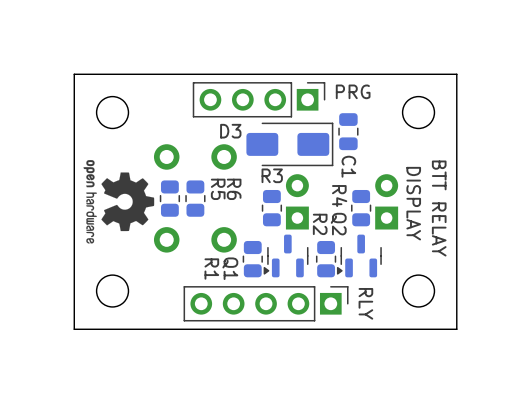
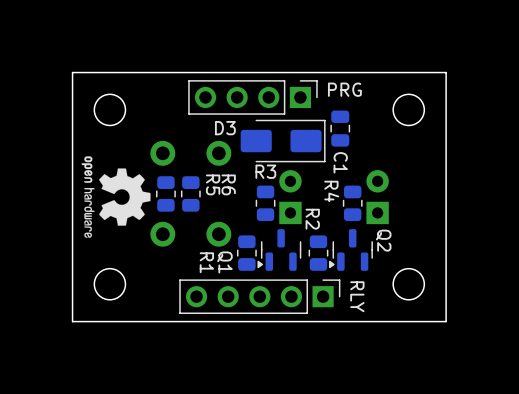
text: DISPLAY (413, 203) -> none
text: BTT RELAY (439, 208) -> none
Q2 name position: Q2 (338, 224) -> Q2 (383, 240)

